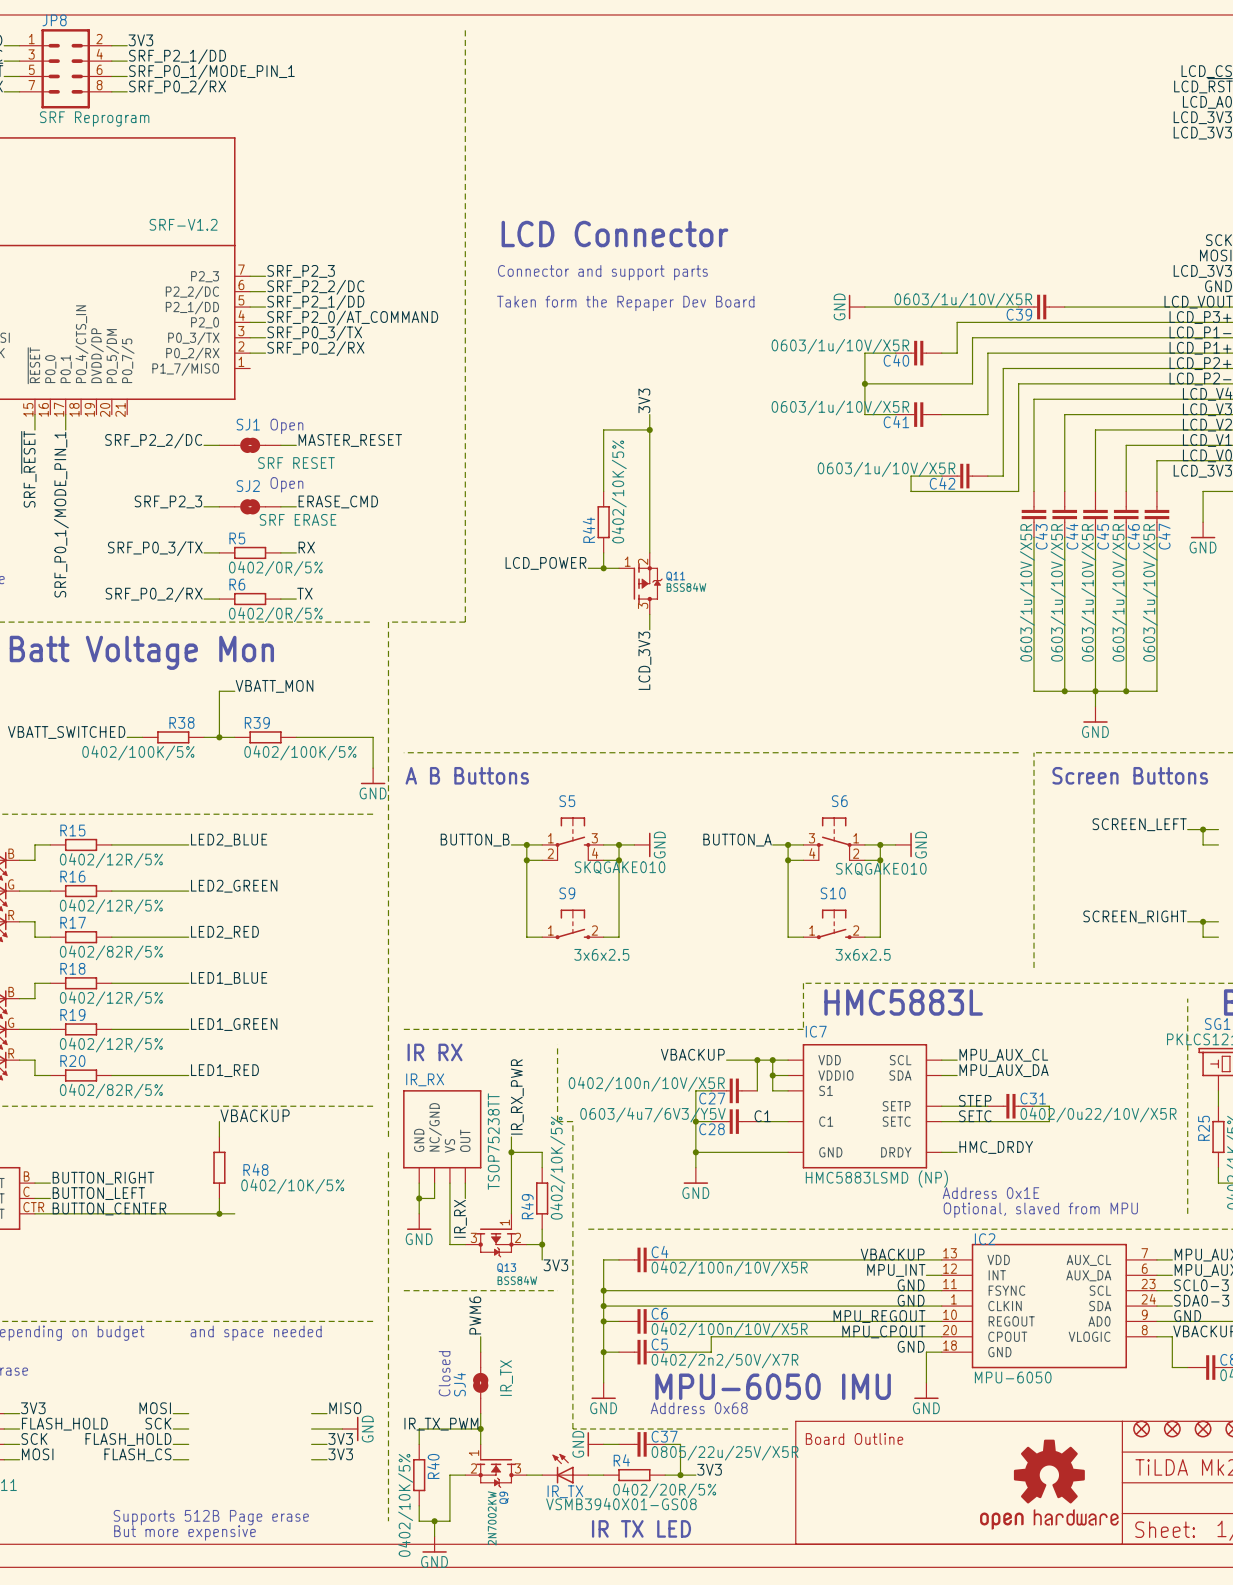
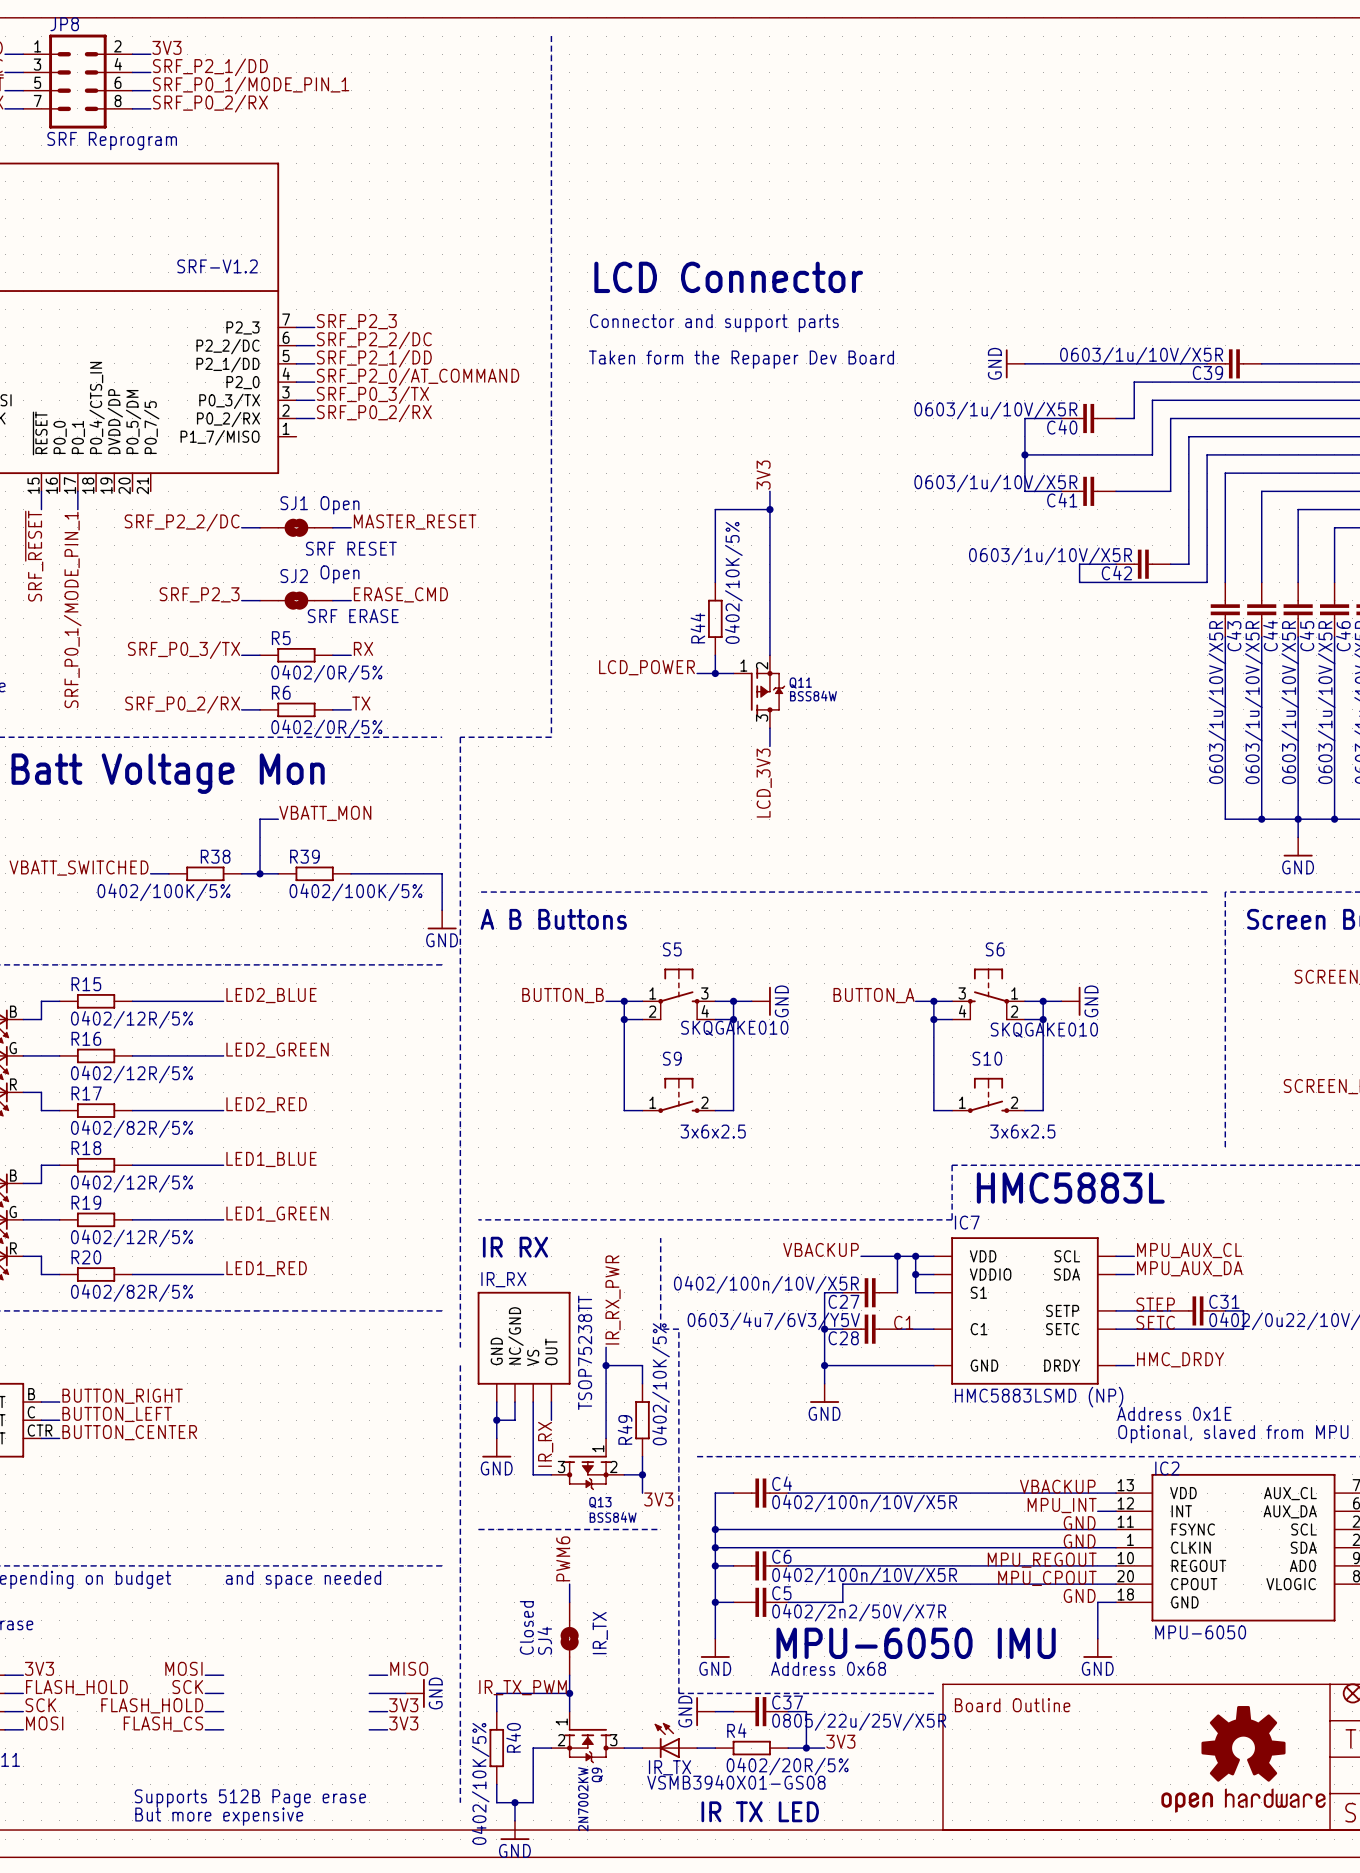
label: VBACKUP (255, 1115) -> none
wire: (219, 1121) (219, 1136) -> none
R48: 0402/10K/5% (219, 1167) -> none
wire: (219, 1198) (219, 1213) -> none
wire: (50, 1213) (234, 1213) -> none
junction: (219, 1213) -> none

